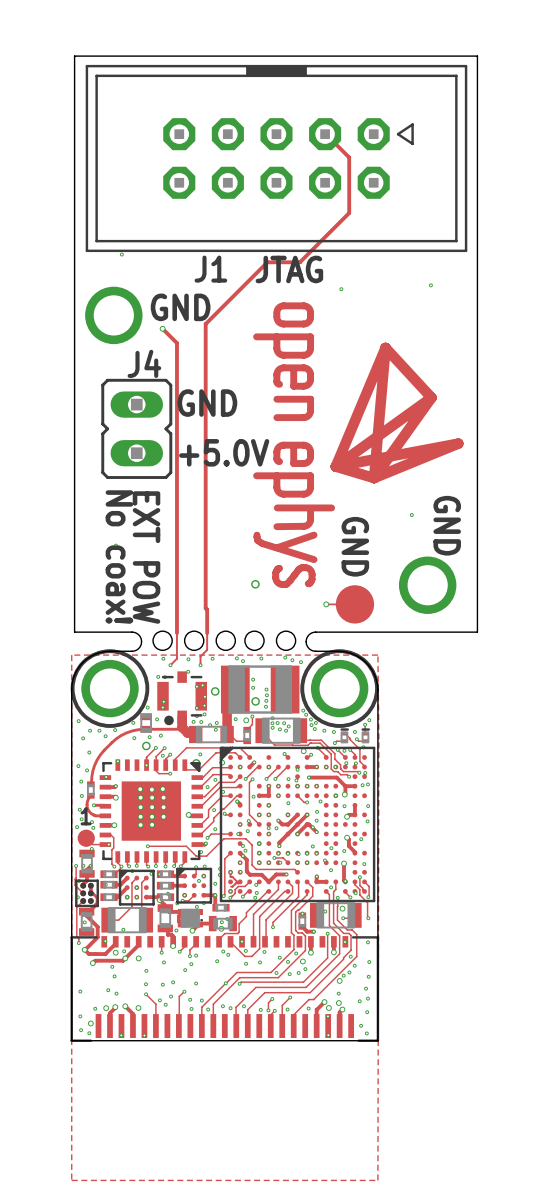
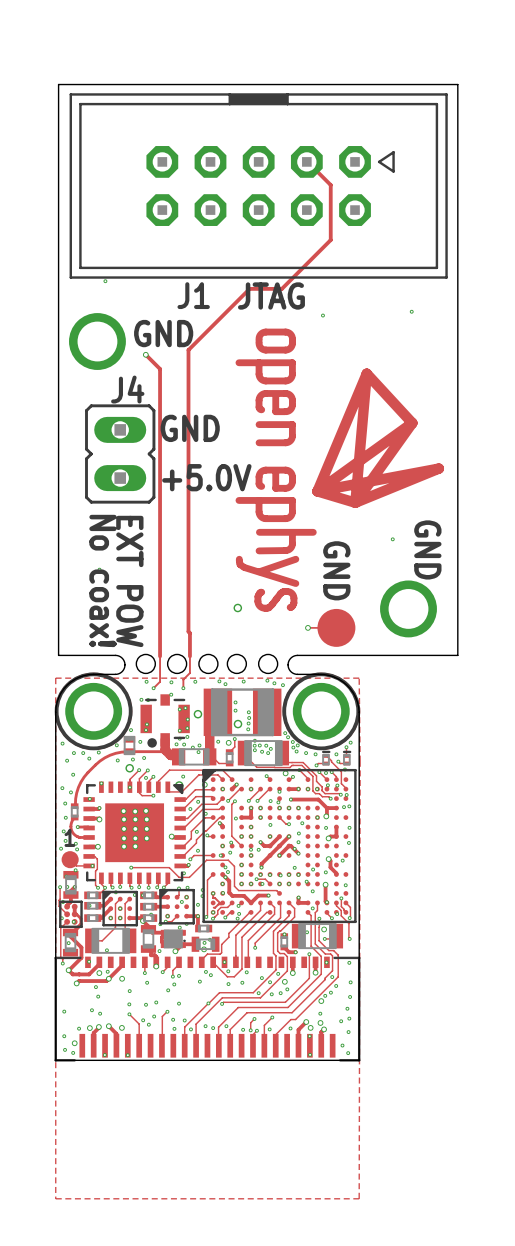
part footprint: [75, 879, 99, 908] -> [59, 900, 83, 929]

